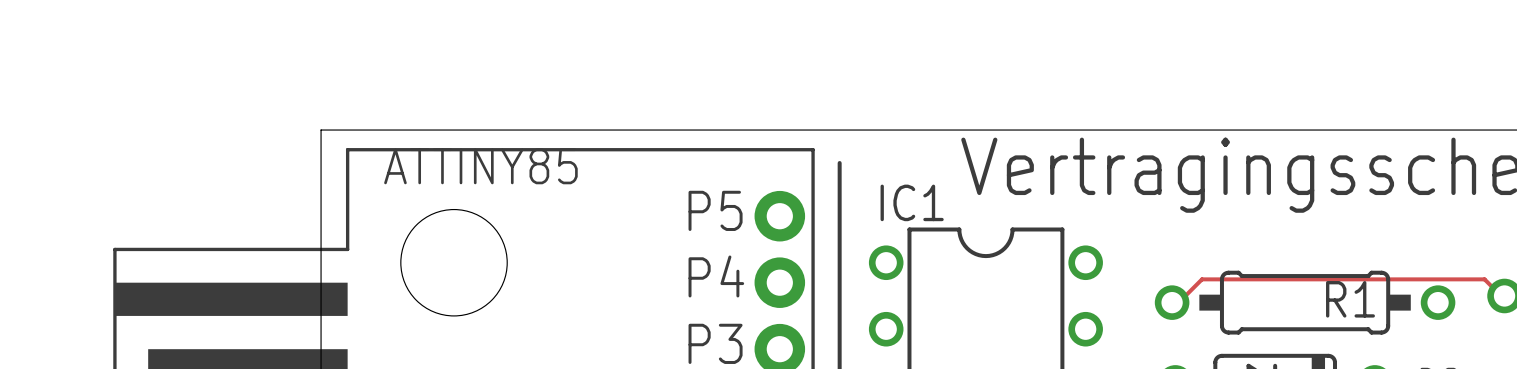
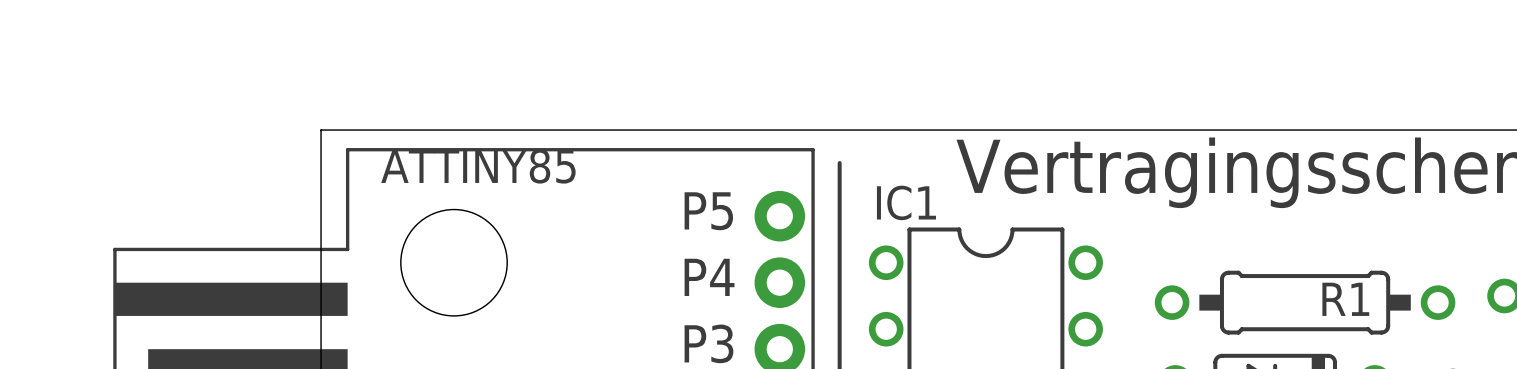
track: (1504, 295) (1501, 295) (1484, 279) (1202, 279) (1185, 295) (1172, 302) -> none

